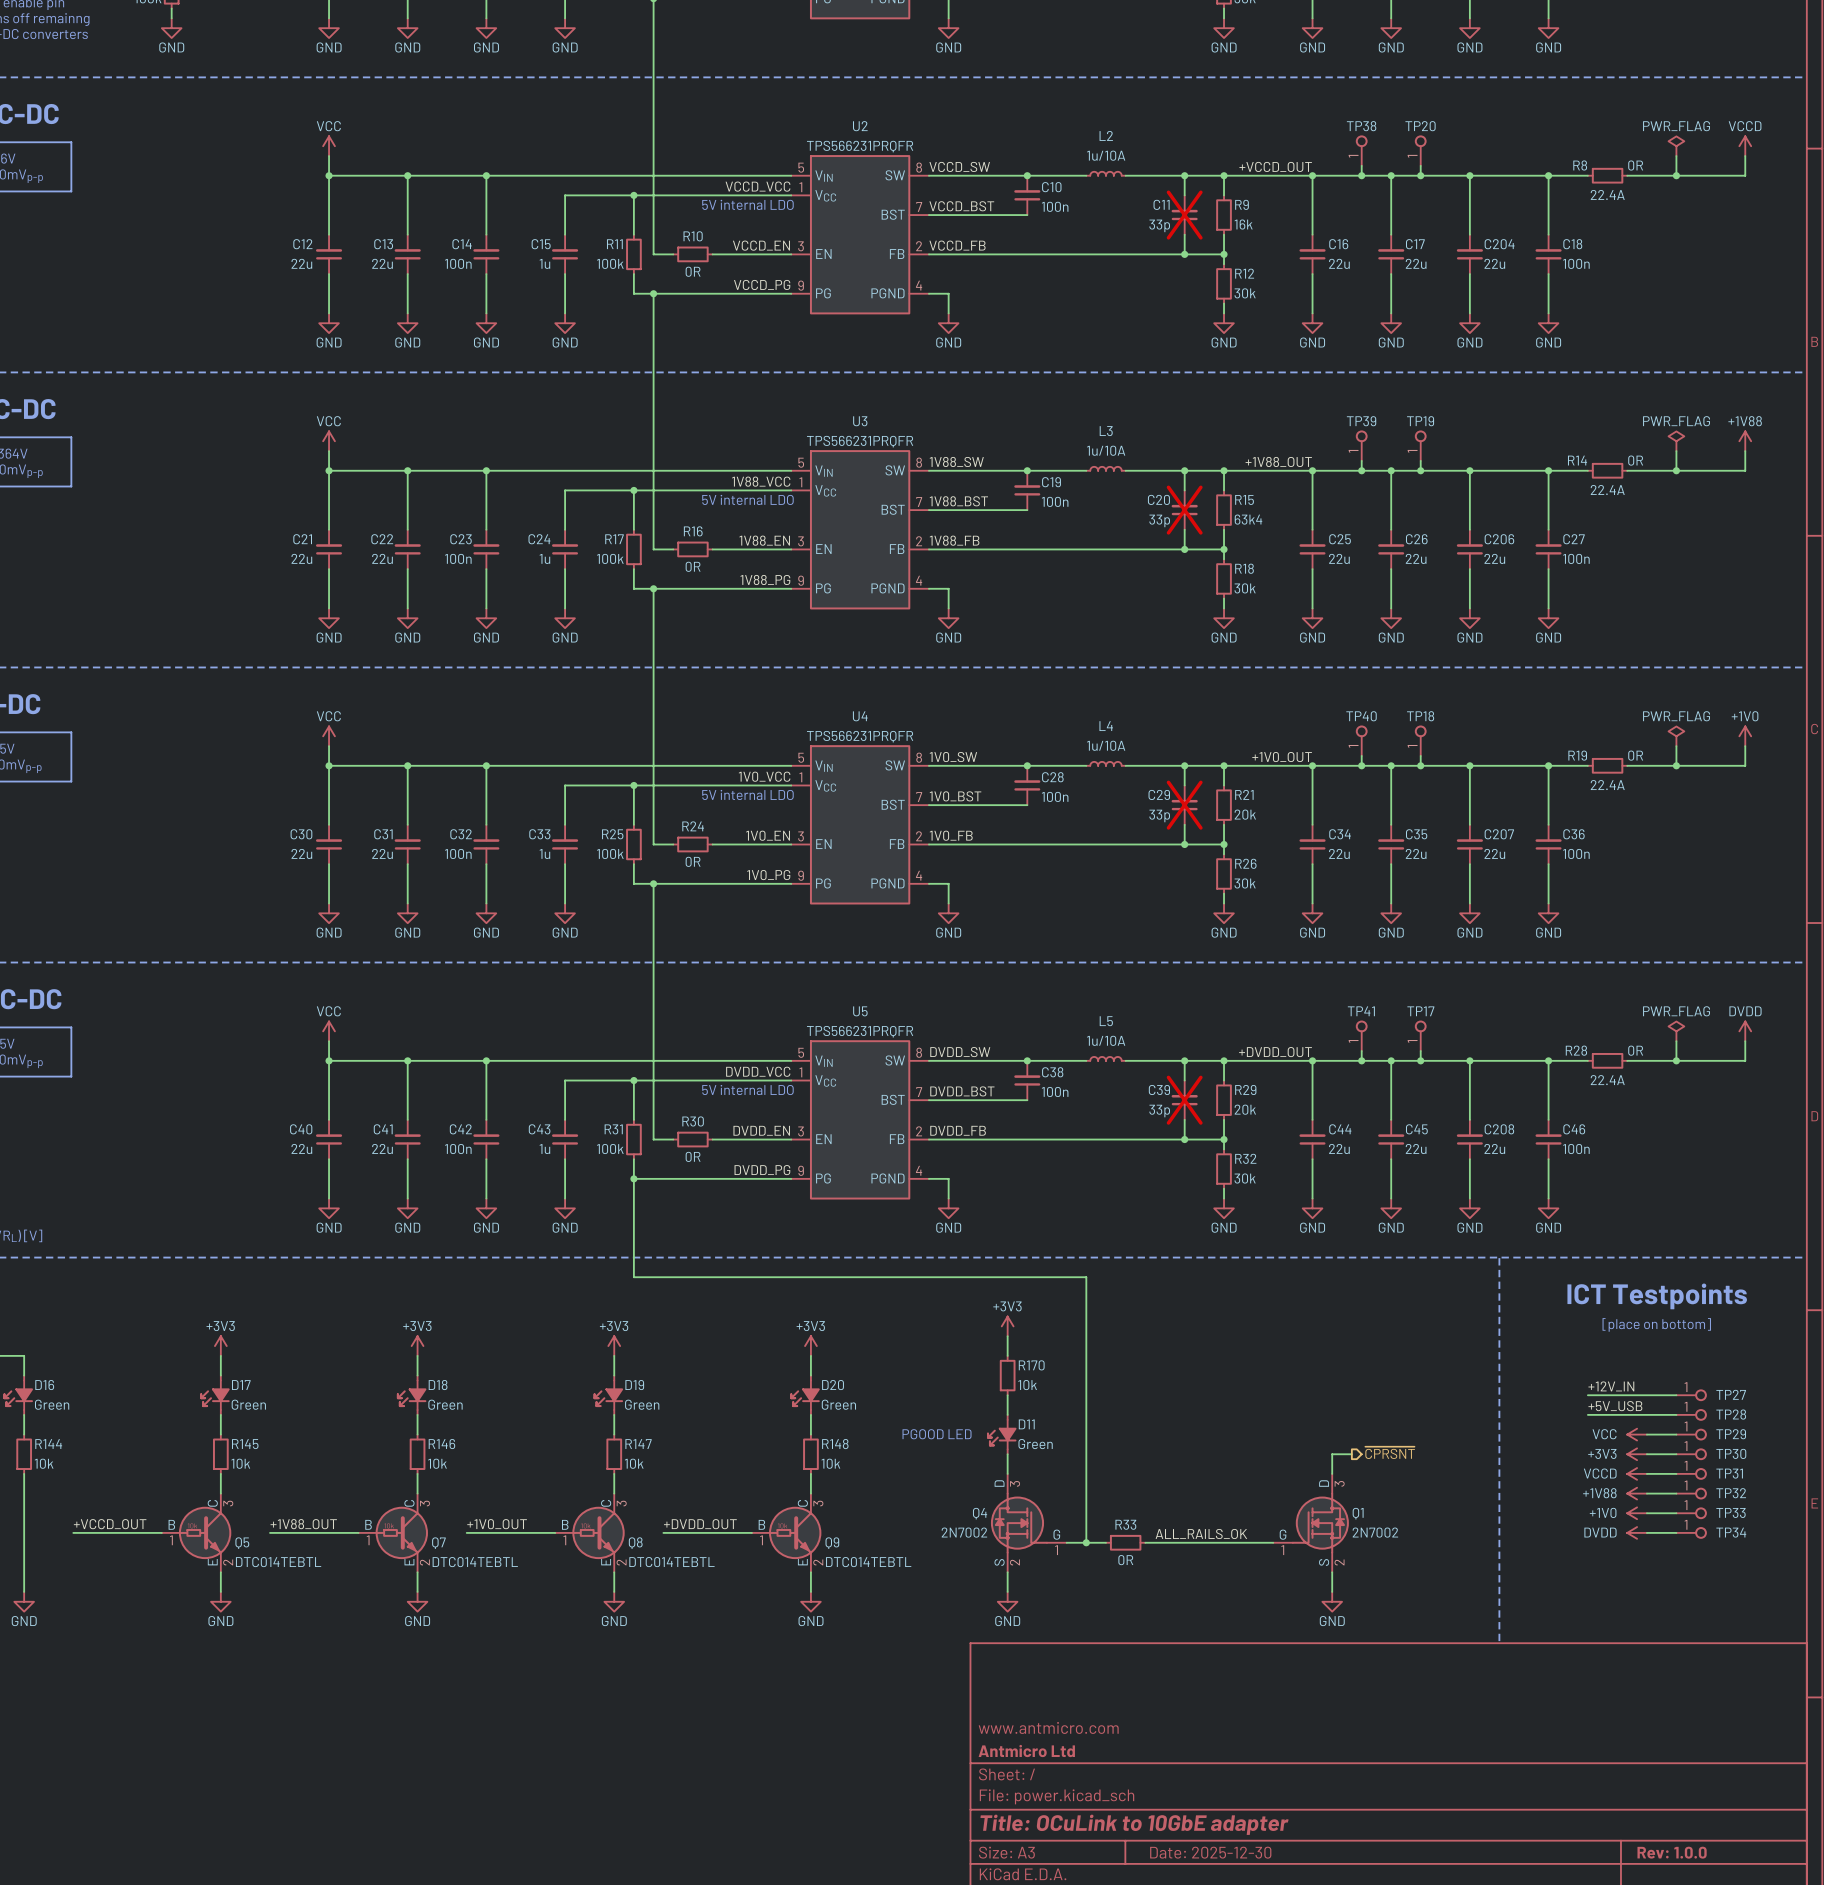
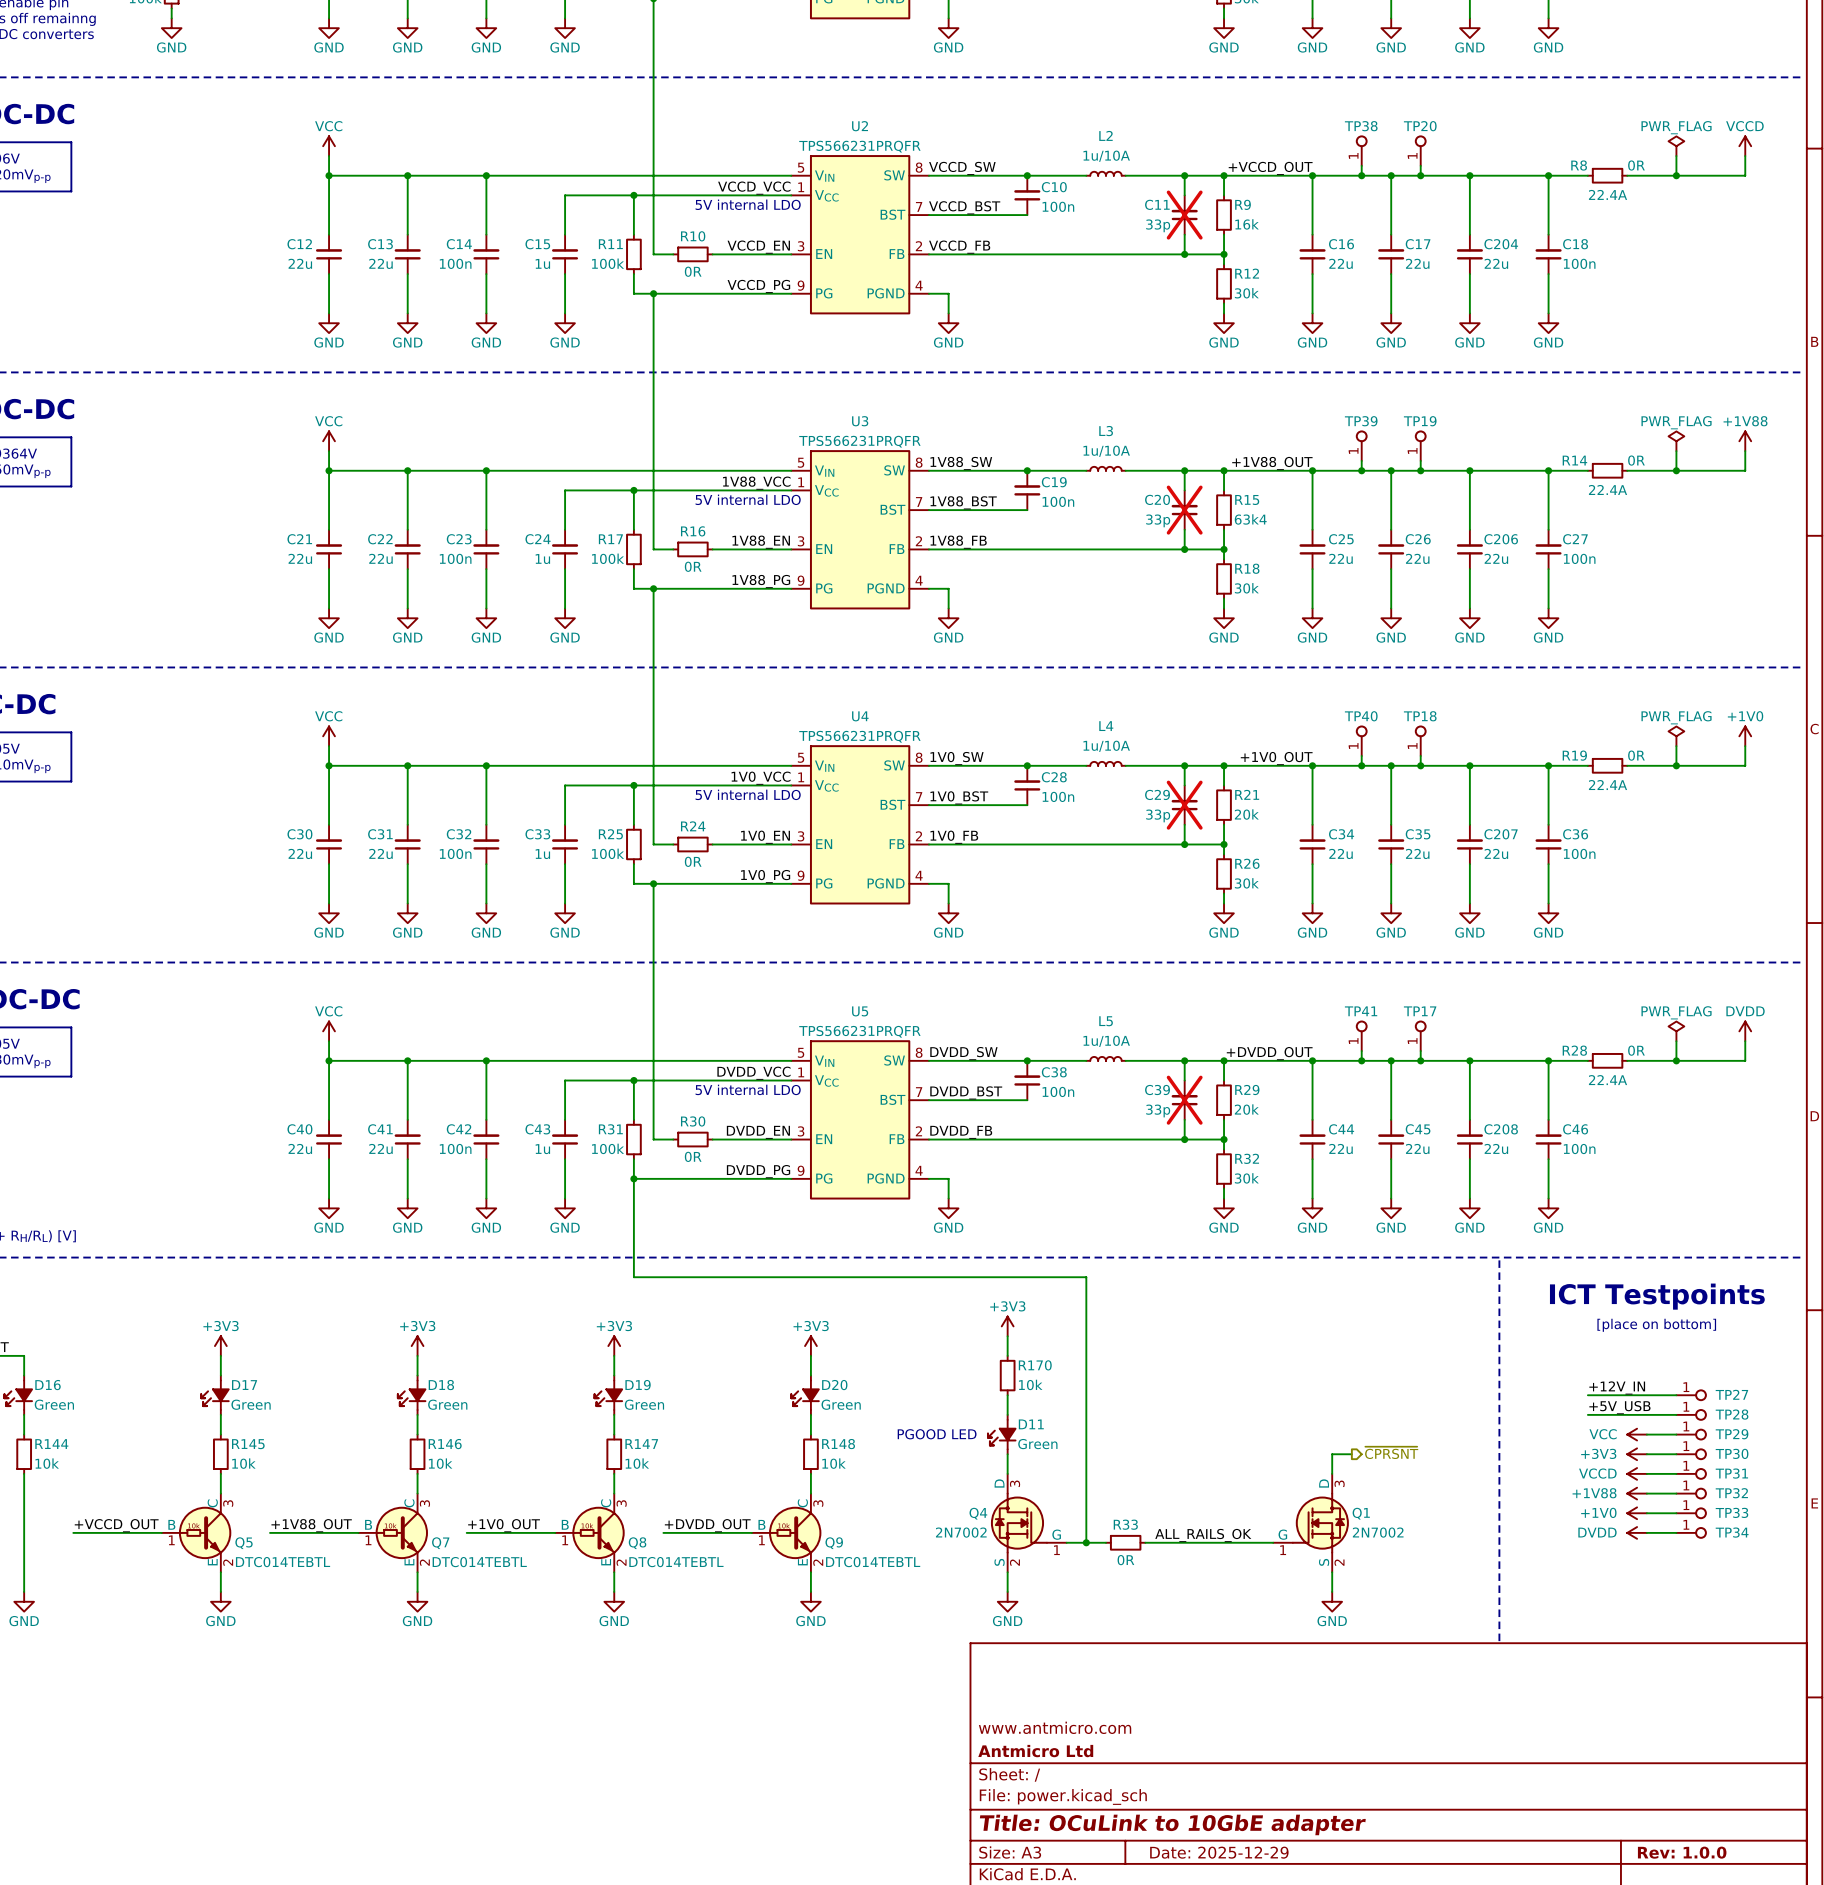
title block: Date: 2025-12-30 (1210, 1852) -> Date: 2025-12-29 (1219, 1852)

